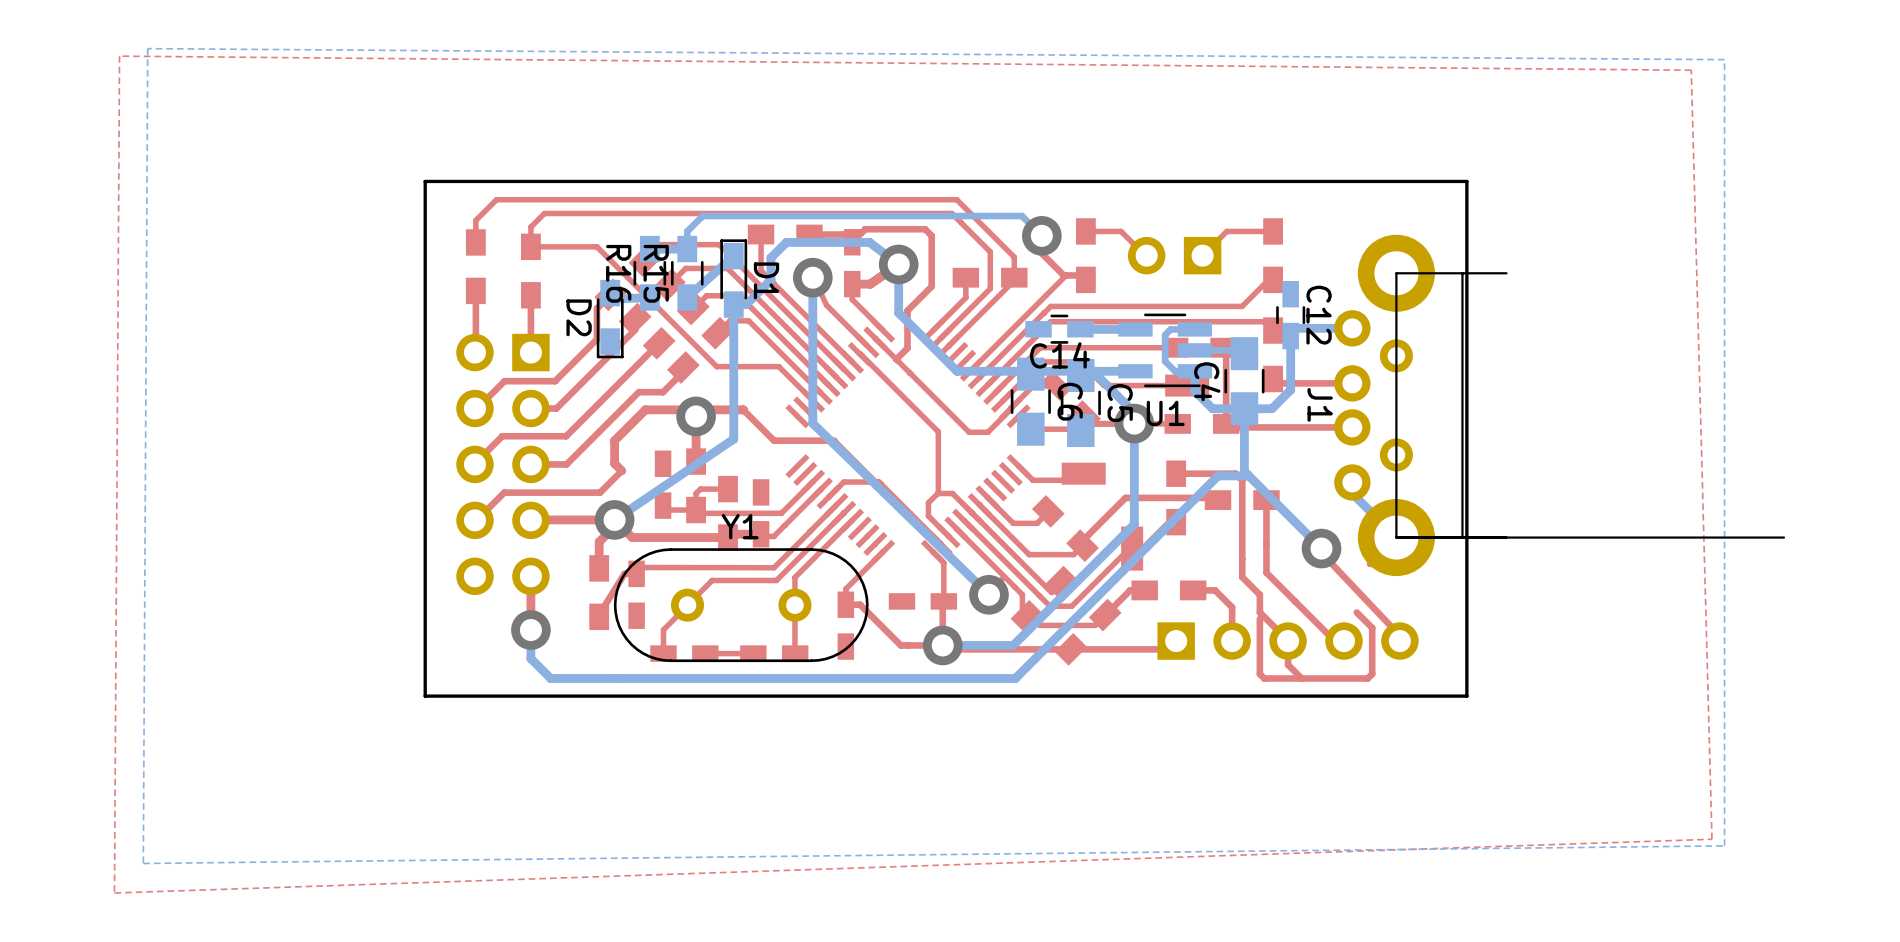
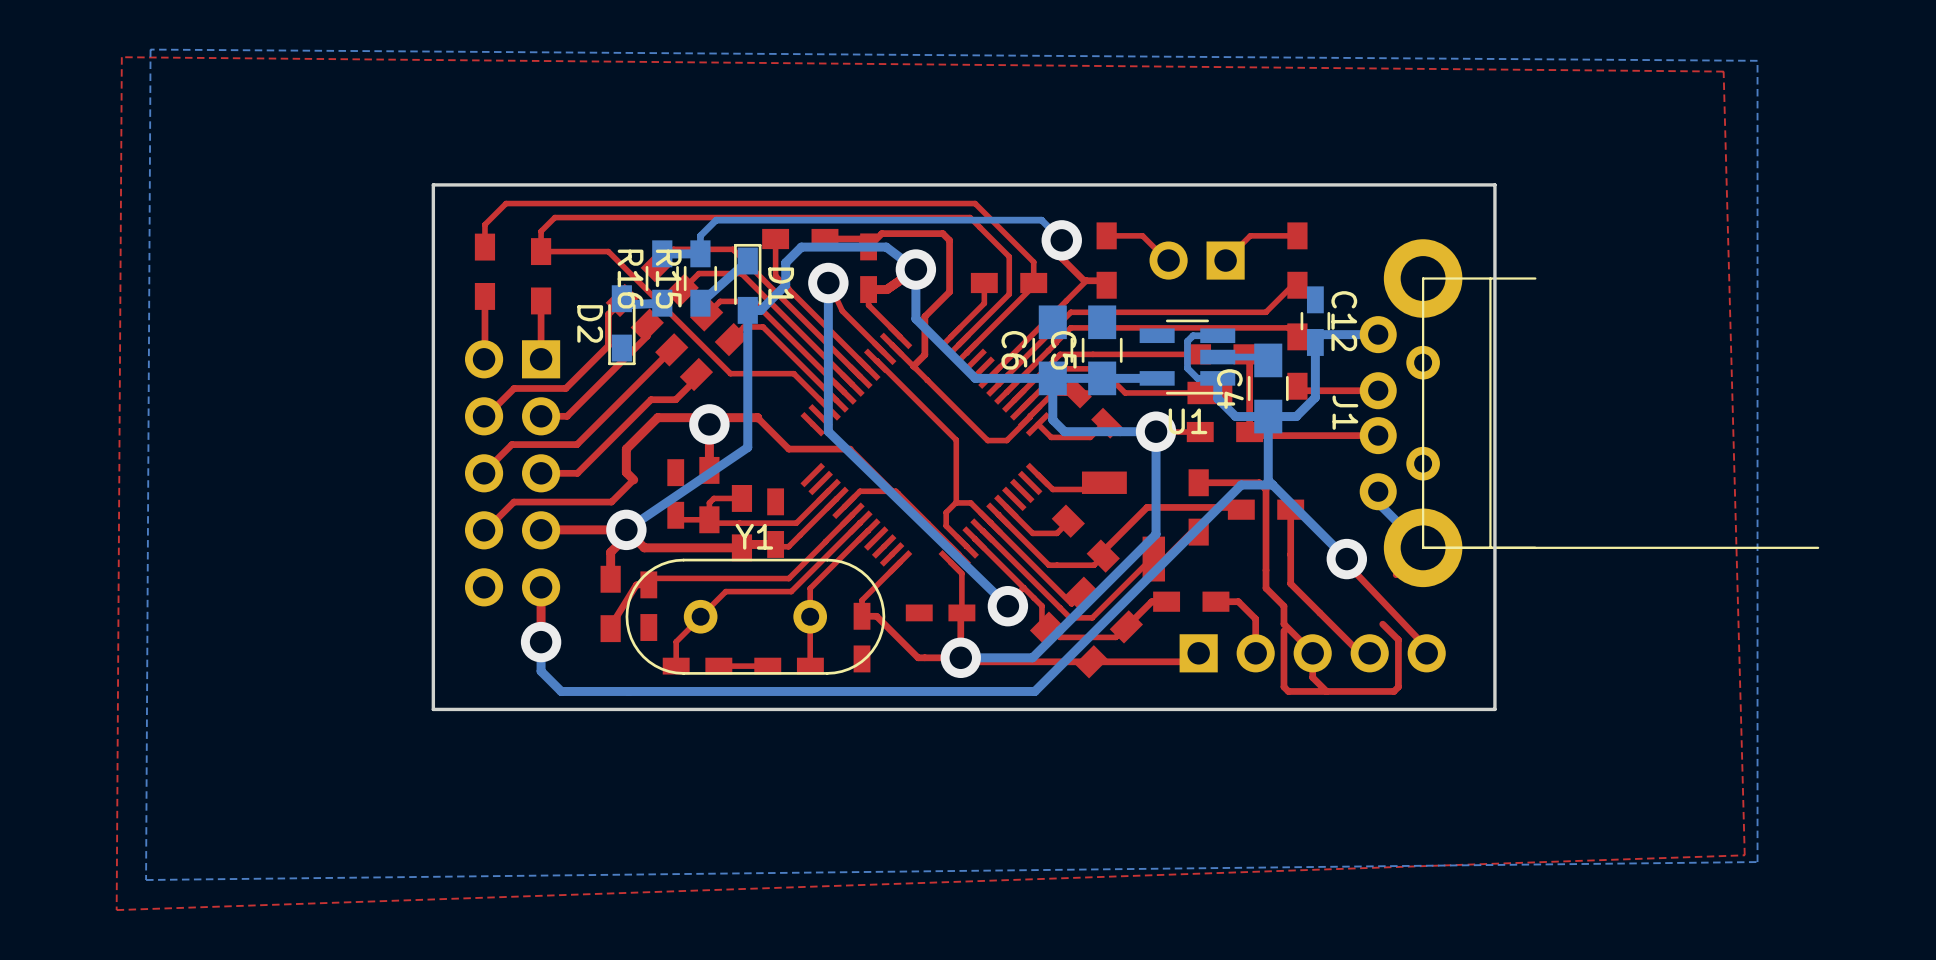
C14: (1059, 329) -> none
bottom track: (1135, 329) (1080, 329) -> none
bottom track: (1080, 375) (1097, 375) (1134, 412) (1134, 423) -> (1052, 378) (1052, 419) (1064, 431) (1156, 431)
C6 position: (1030, 401) -> (1052, 350)
C6 name position: C6 (1070, 401) -> C6 (1014, 350)
C5 position: (1080, 402) -> (1102, 350)
C5 name position: C5 (1120, 402) -> C5 (1063, 350)

